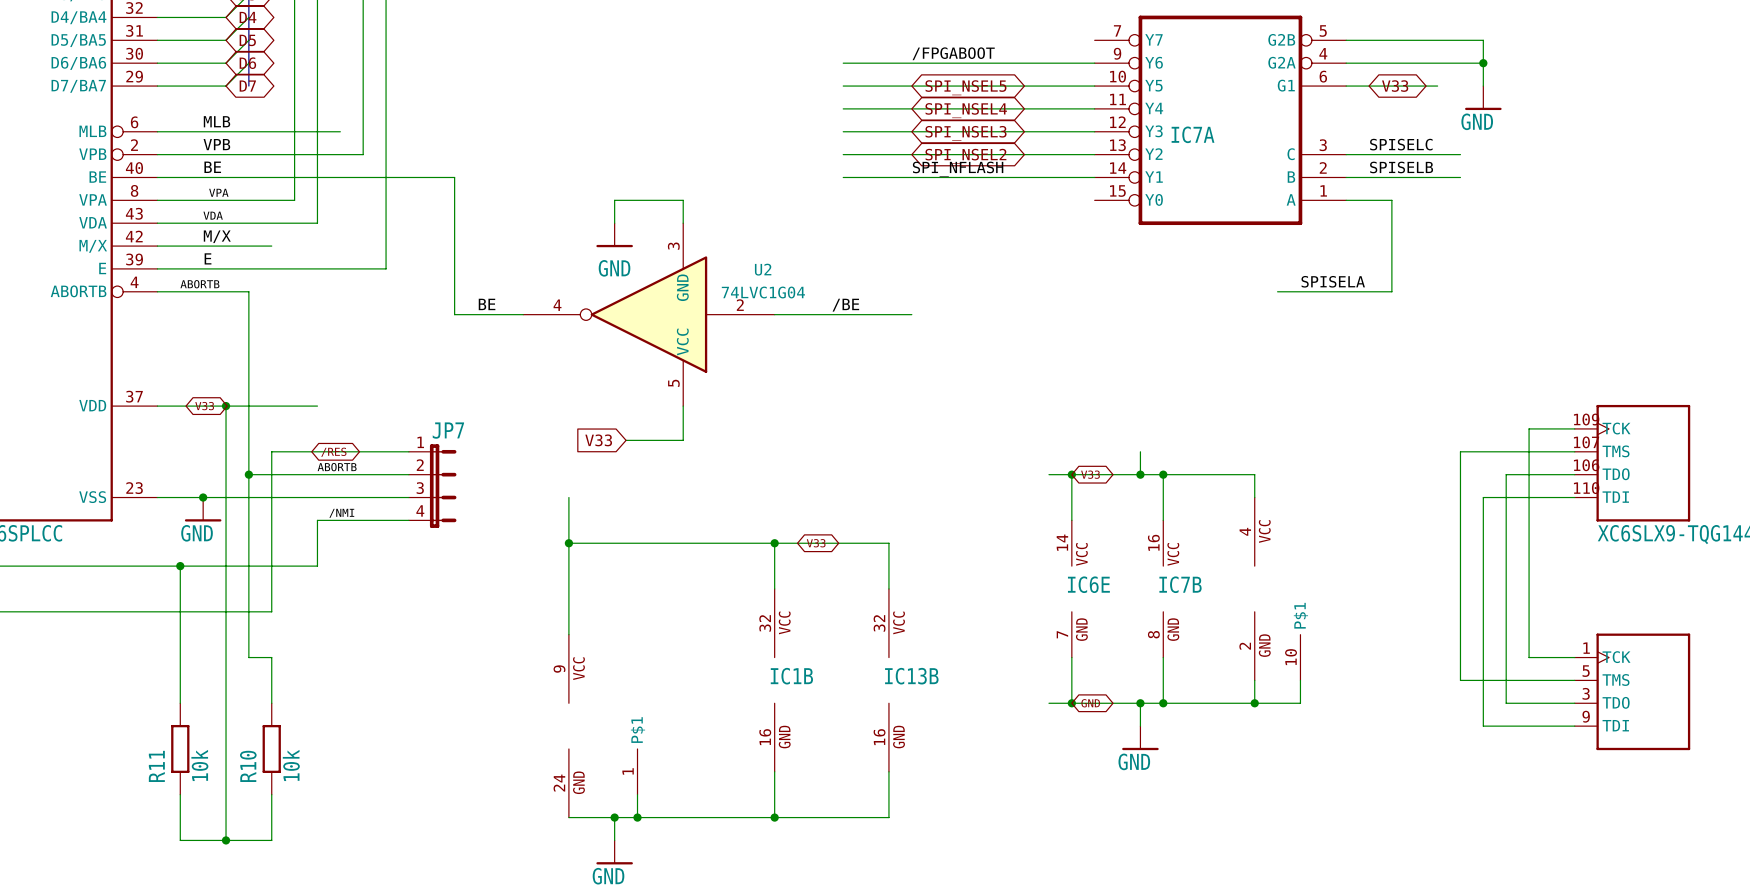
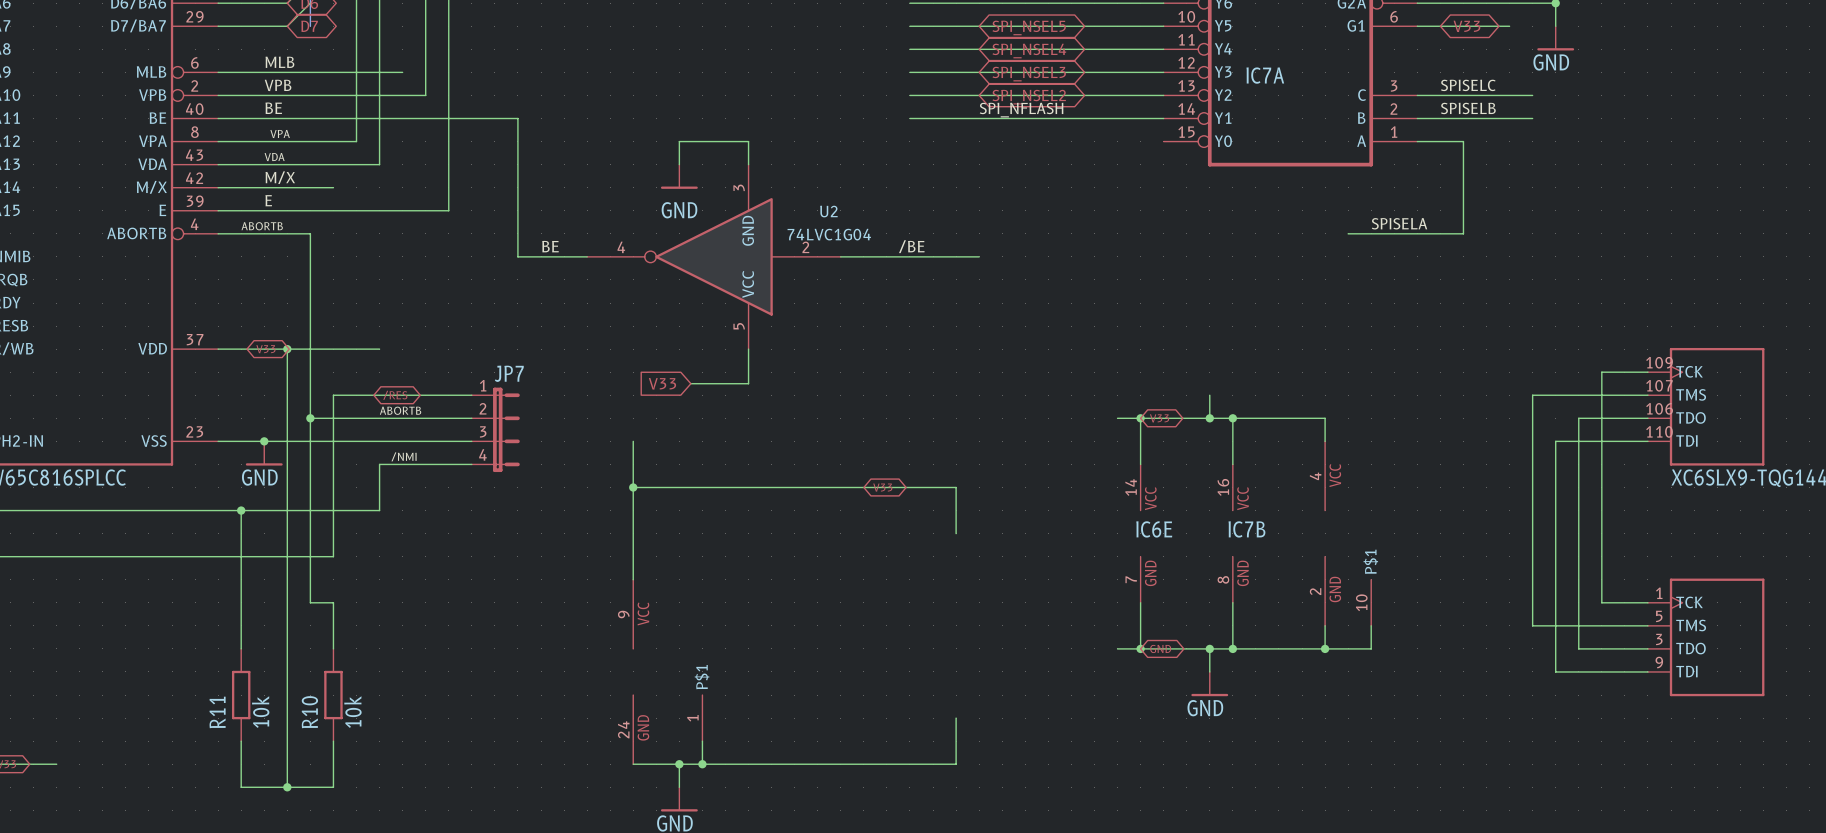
wire: (774, 543) (774, 588) -> none
junction: (774, 543) -> none
IC1B: (774, 680) -> none
IC13B: (888, 680) -> none
wire: (774, 771) (774, 817) -> none
junction: (774, 817) -> none

